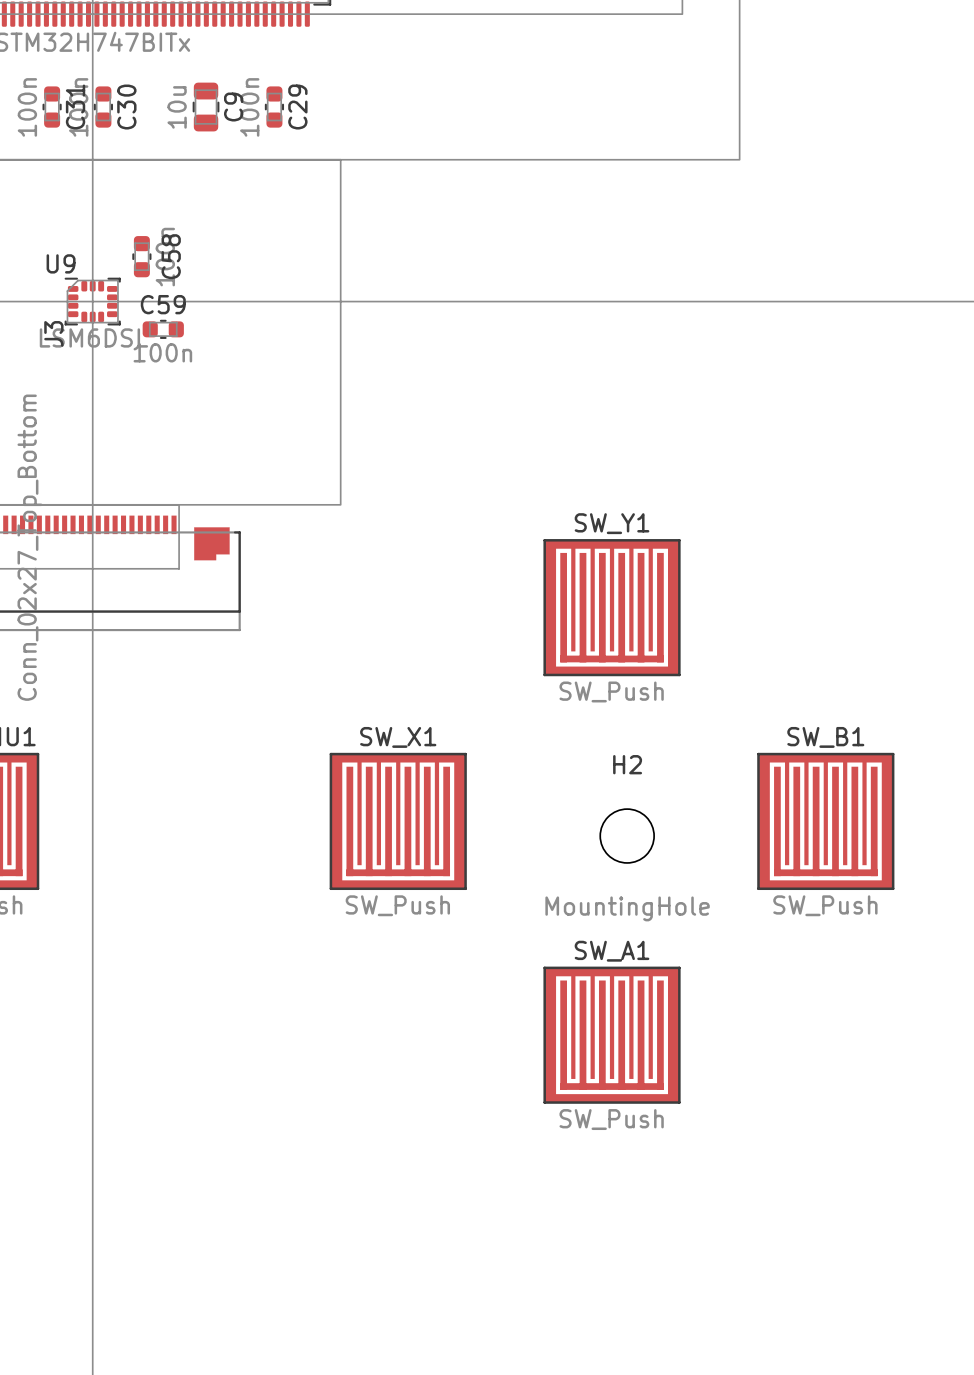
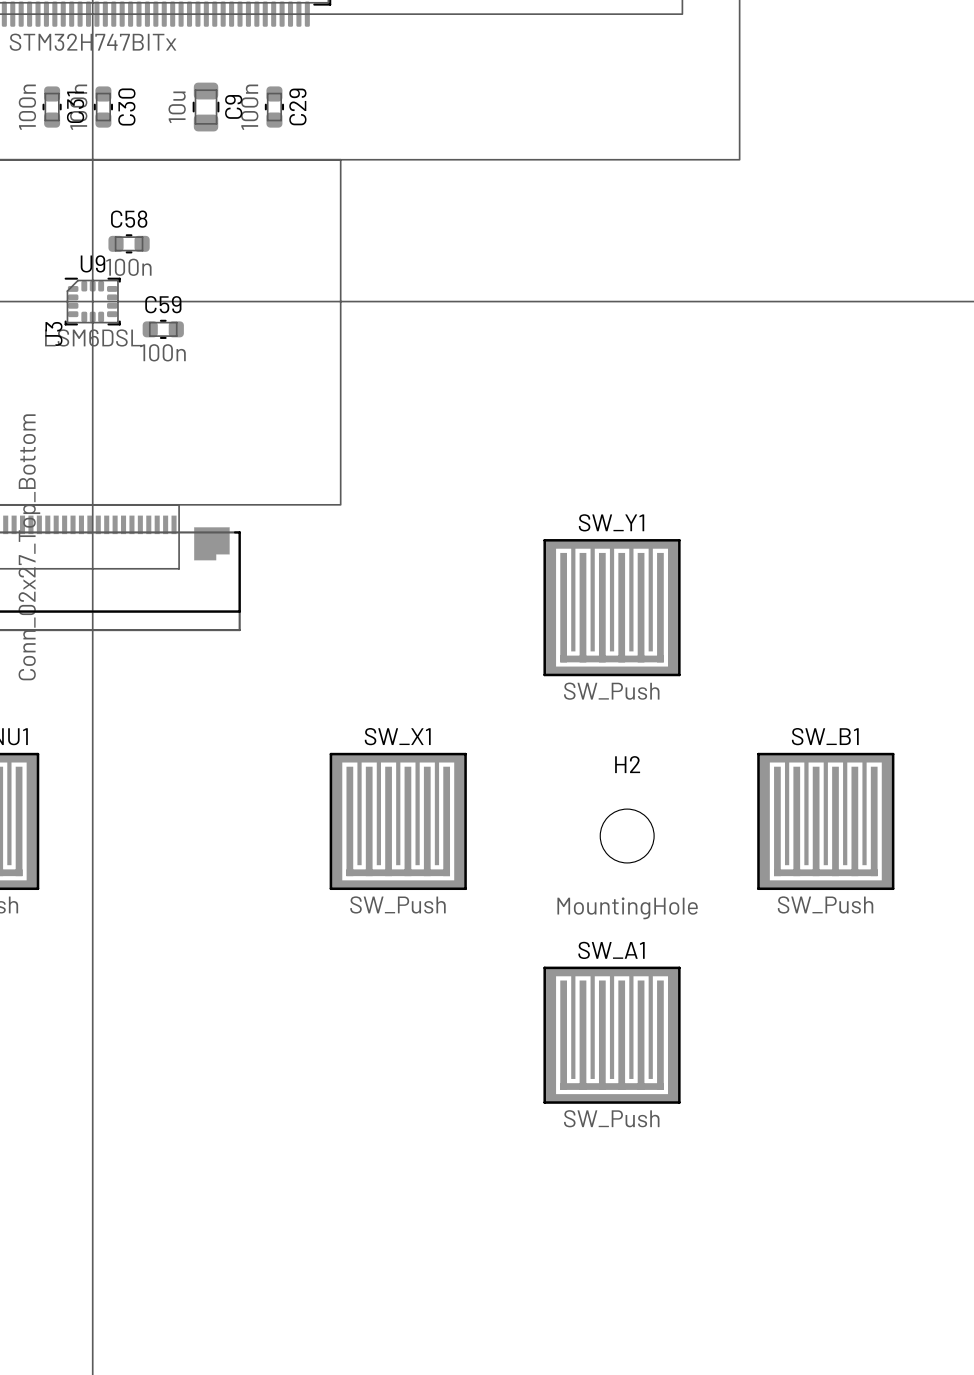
C58 rotation: 0° (141, 256) -> 90° clockwise (129, 243)
C58 name position: C58 (171, 256) -> C58 (129, 219)
U9 name position: U9 (61, 263) -> U9 (92, 263)

